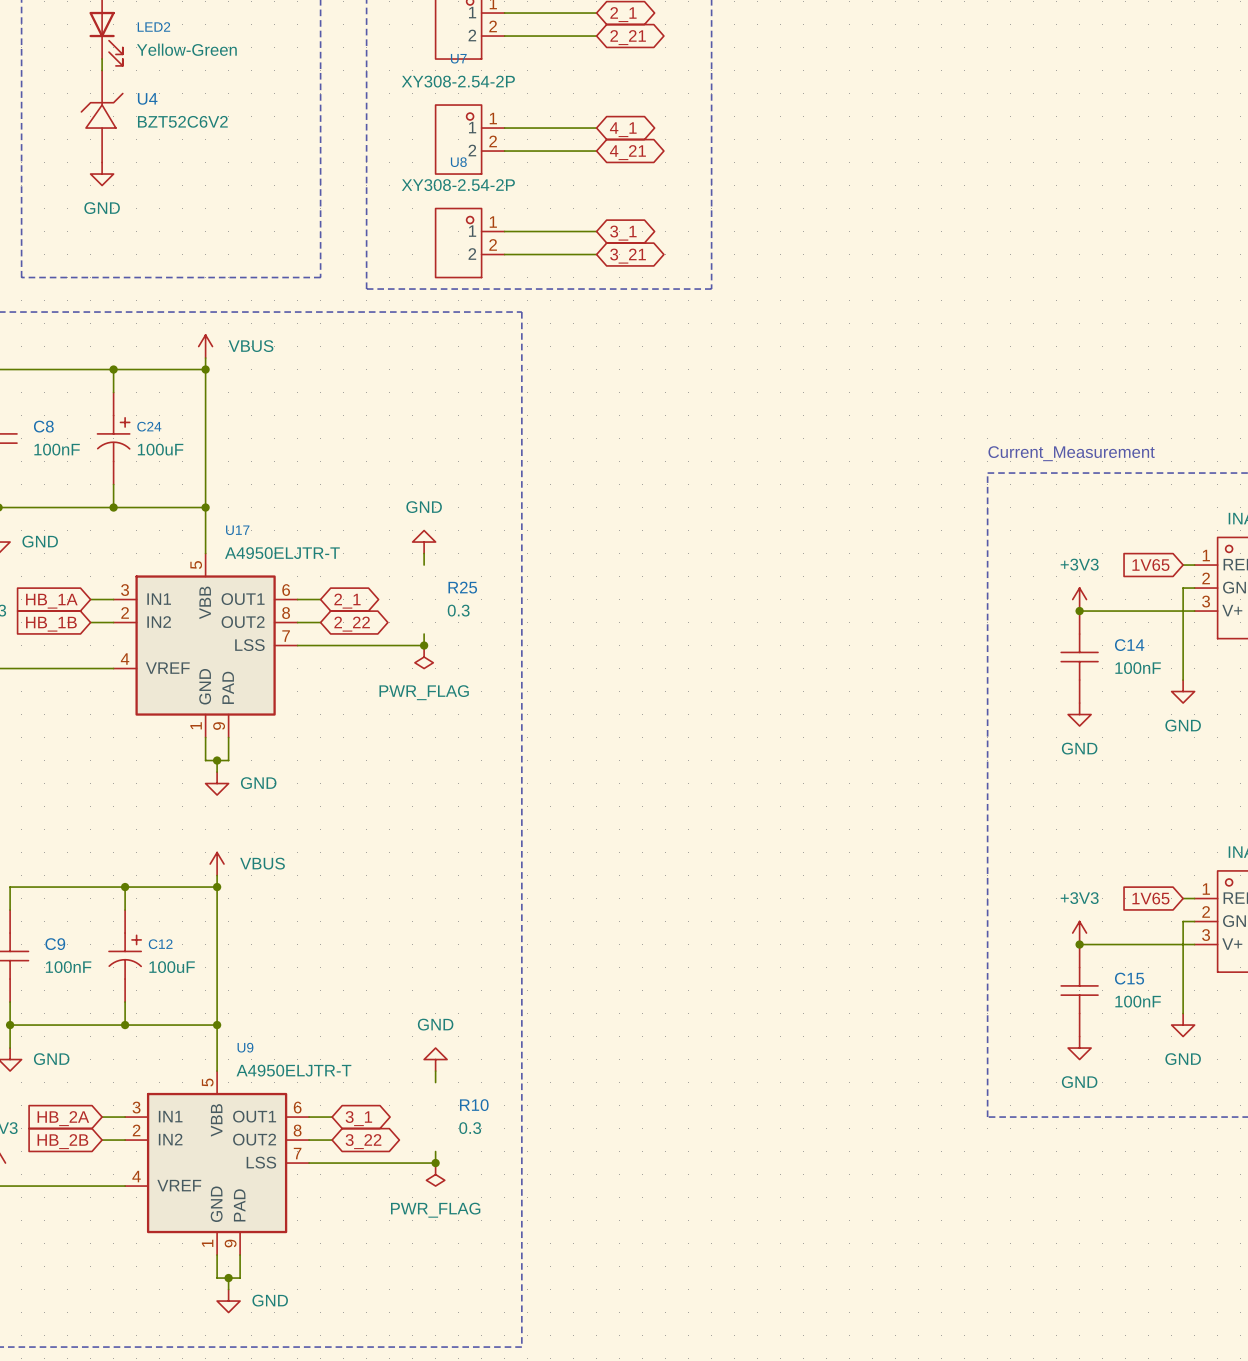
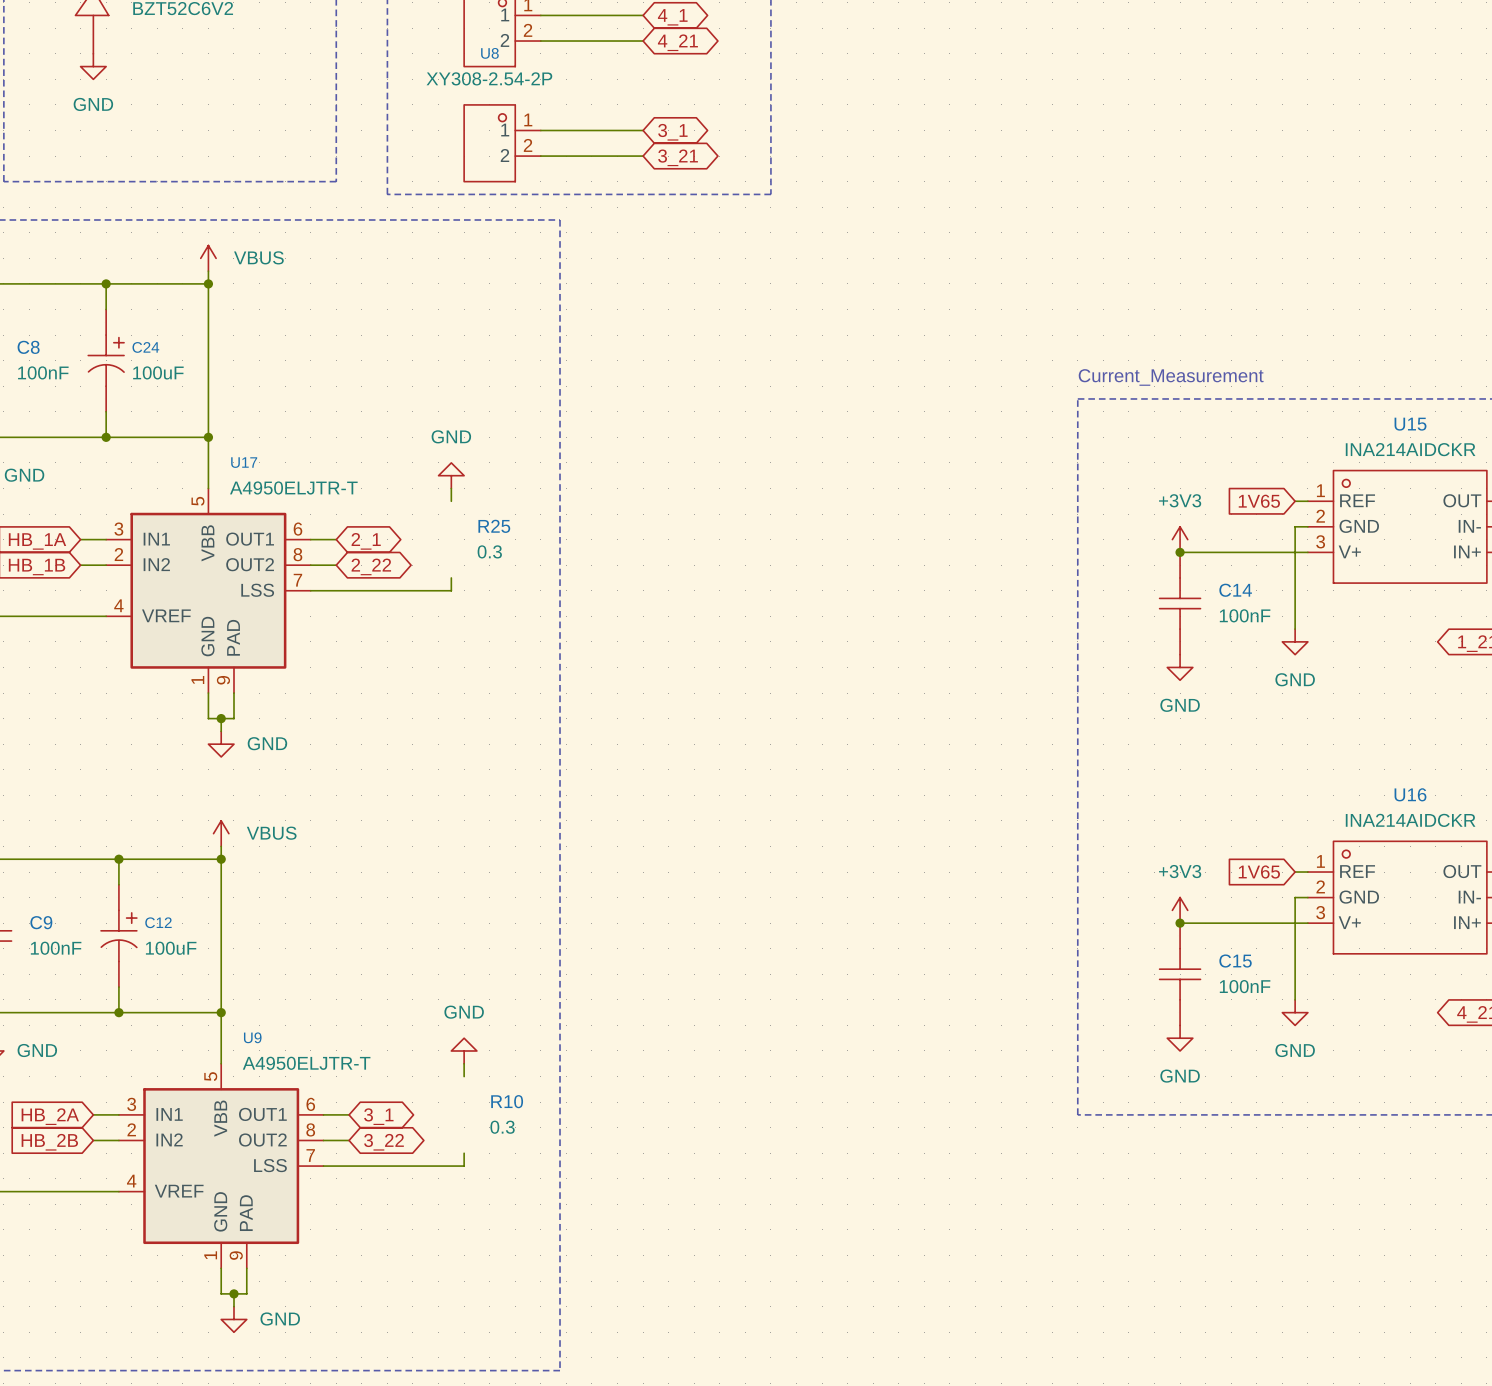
junction: (424, 645) -> none
power symbol: PWR_FLAG (424, 657) -> none
junction: (435, 1163) -> none
power symbol: PWR_FLAG (435, 1174) -> none

